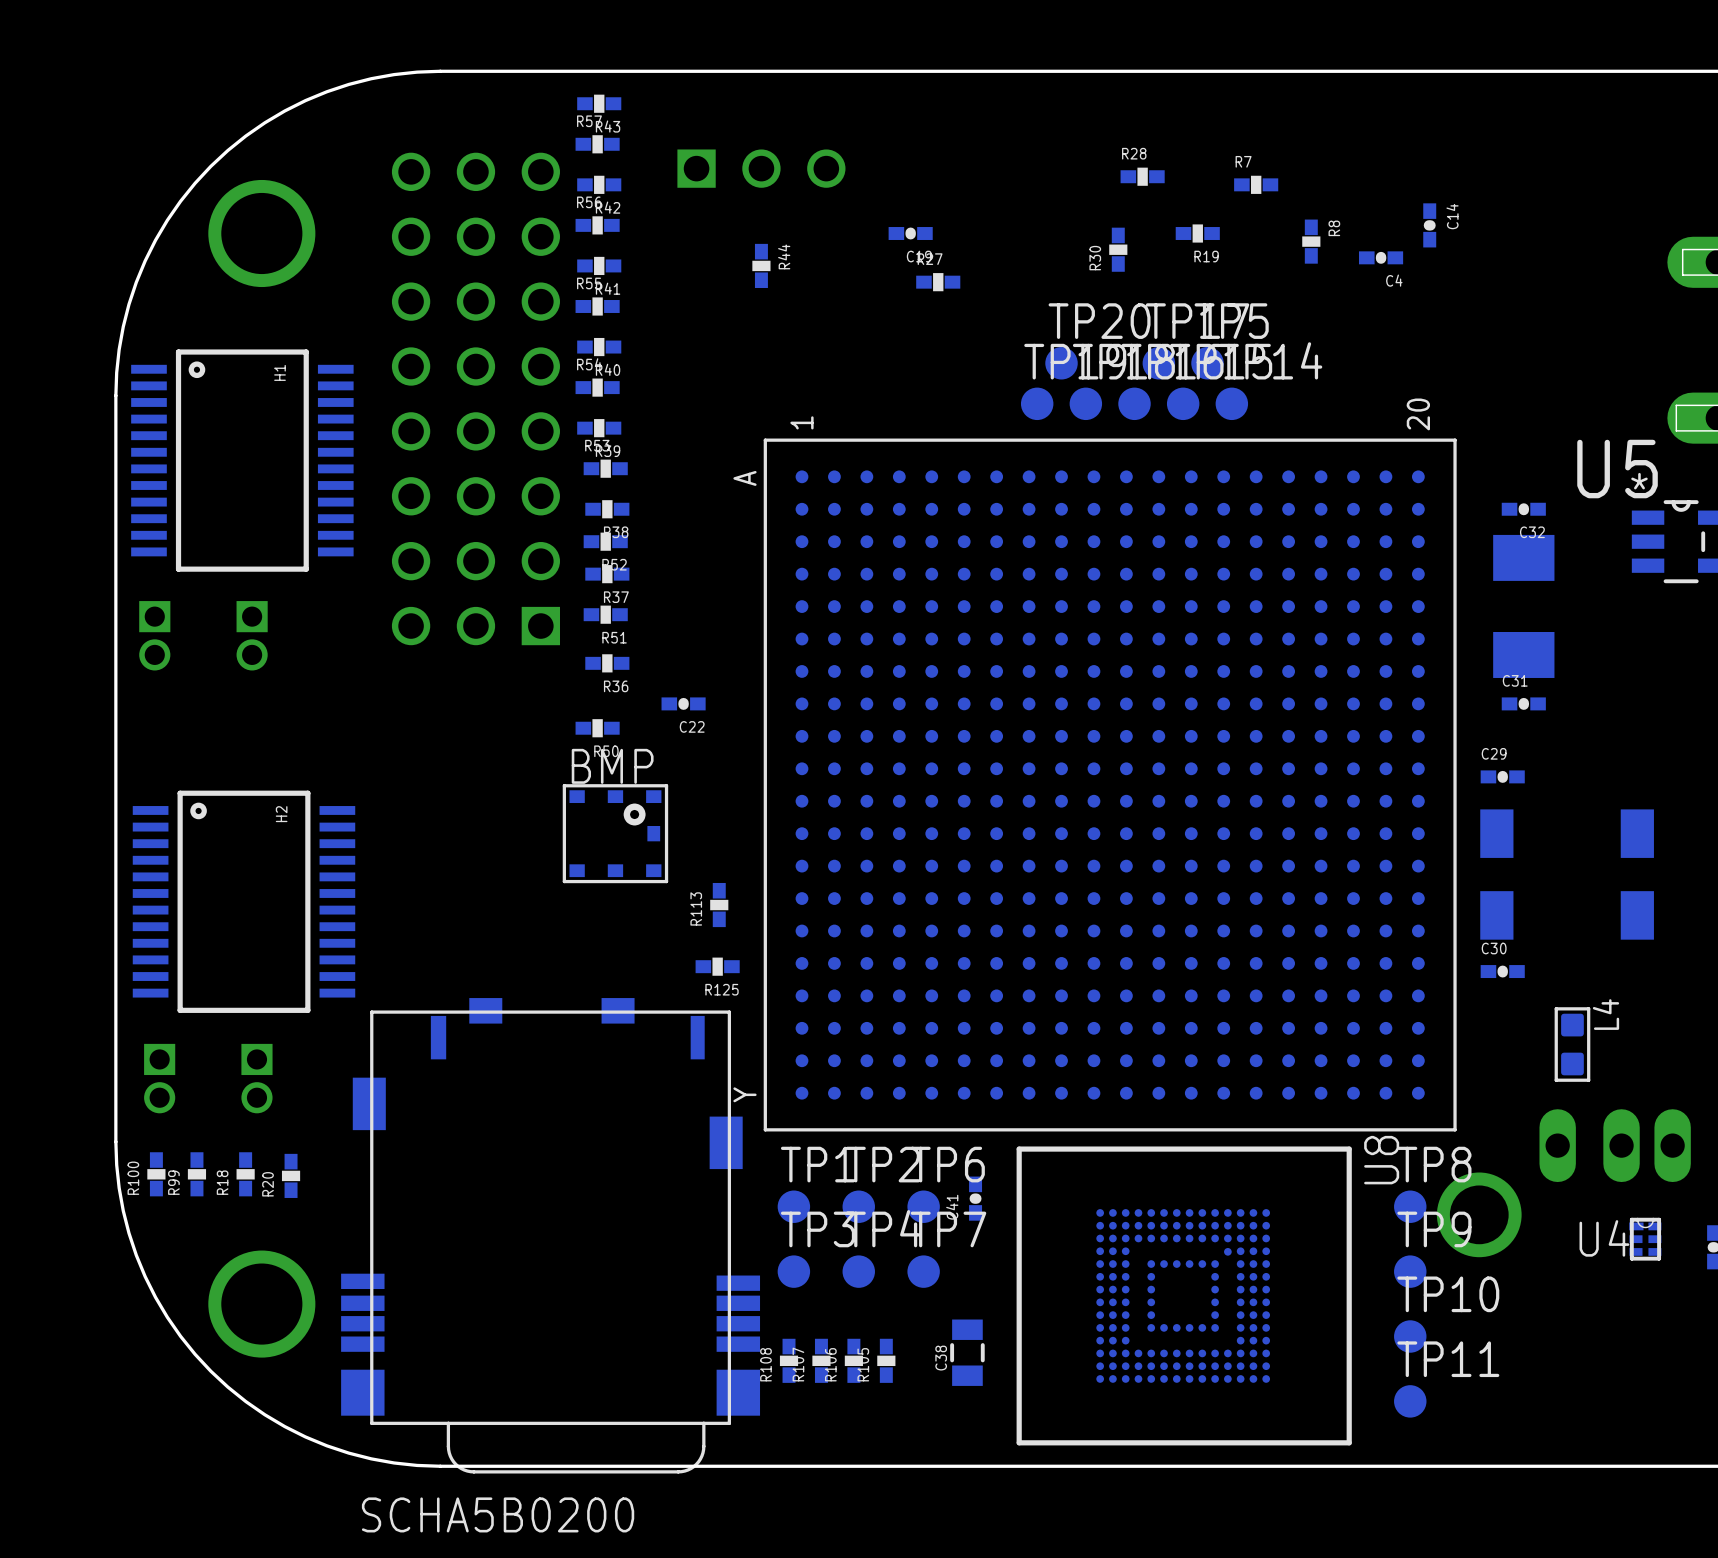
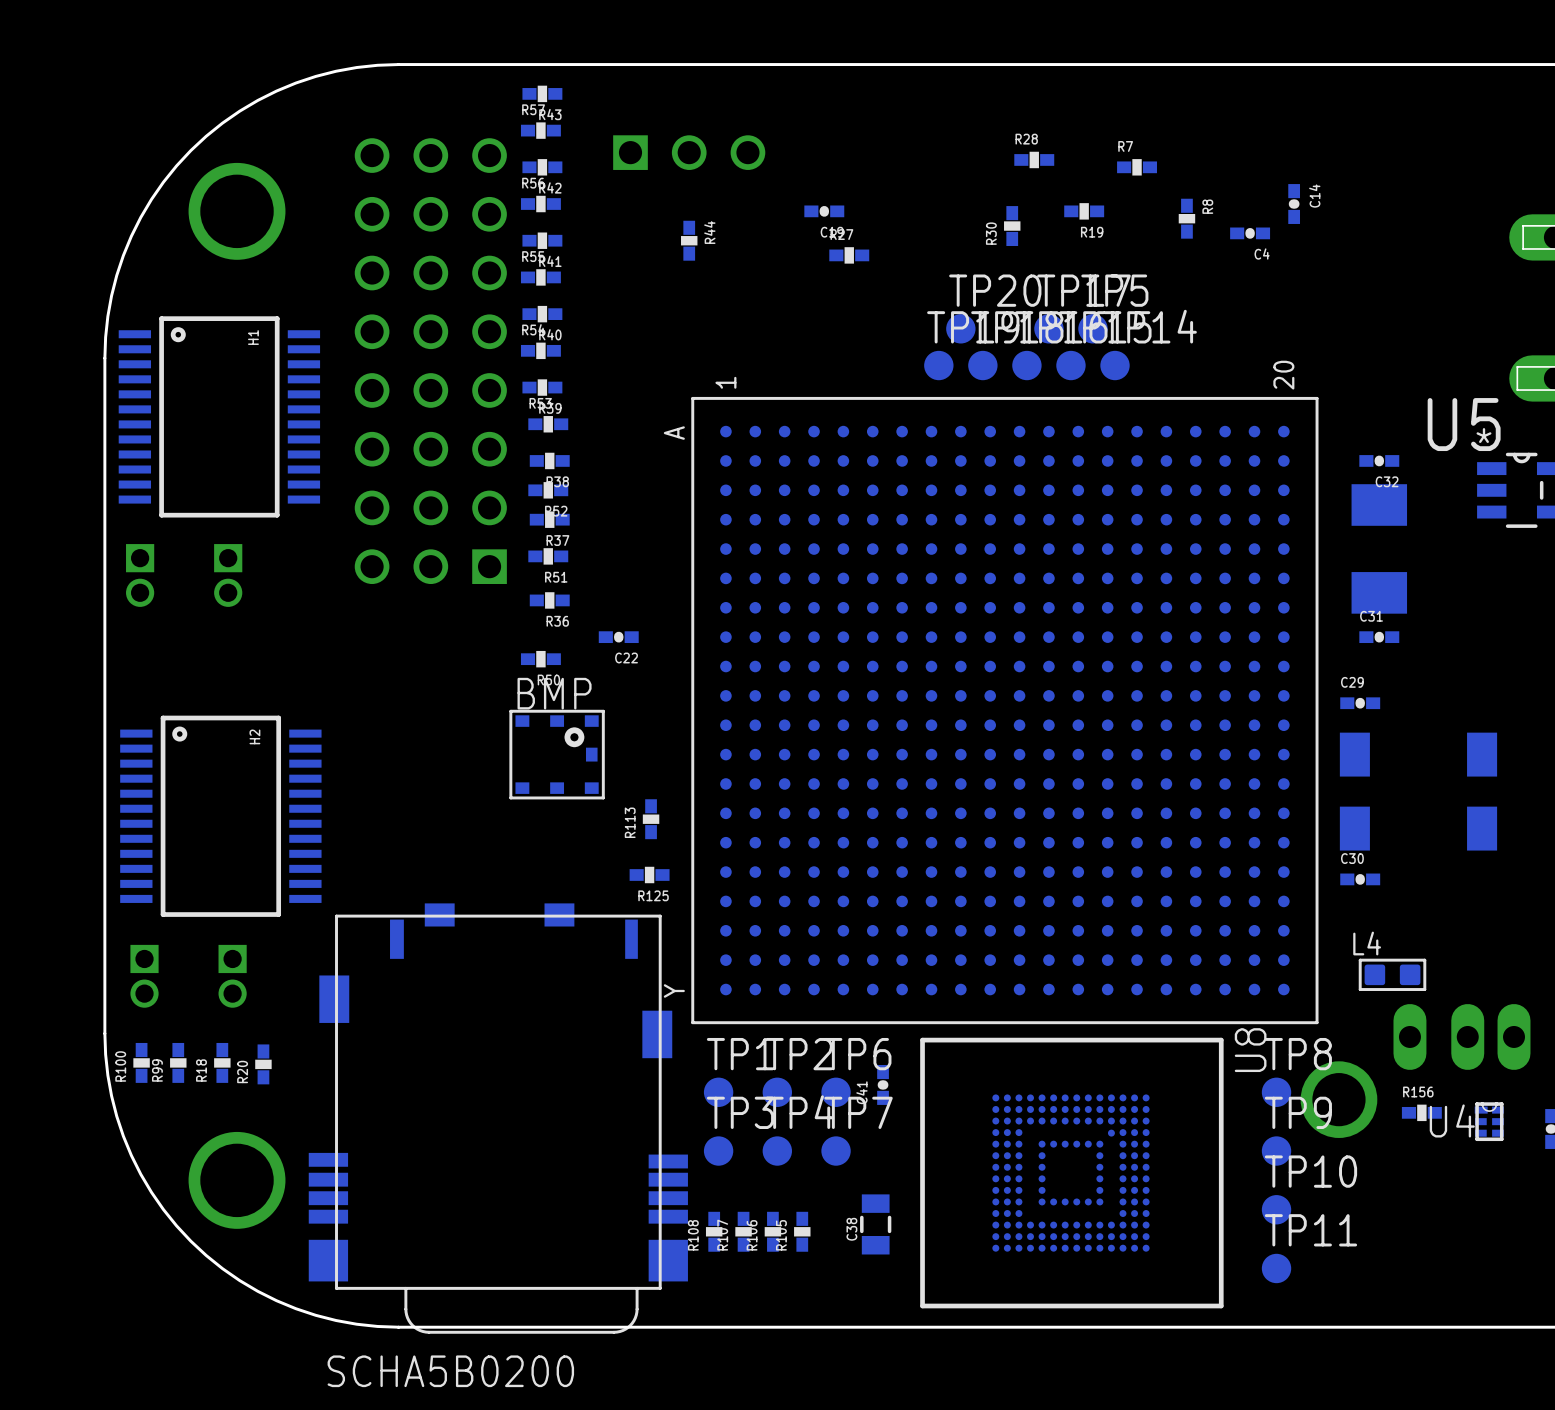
L4 name position: L4 (1605, 1014) -> L4 (1367, 943)
L4 rotation: 0° (1572, 1044) -> 90° clockwise (1392, 974)
L4 position: (1572, 1044) -> (1392, 974)
R156: none -> (1421, 1112)

